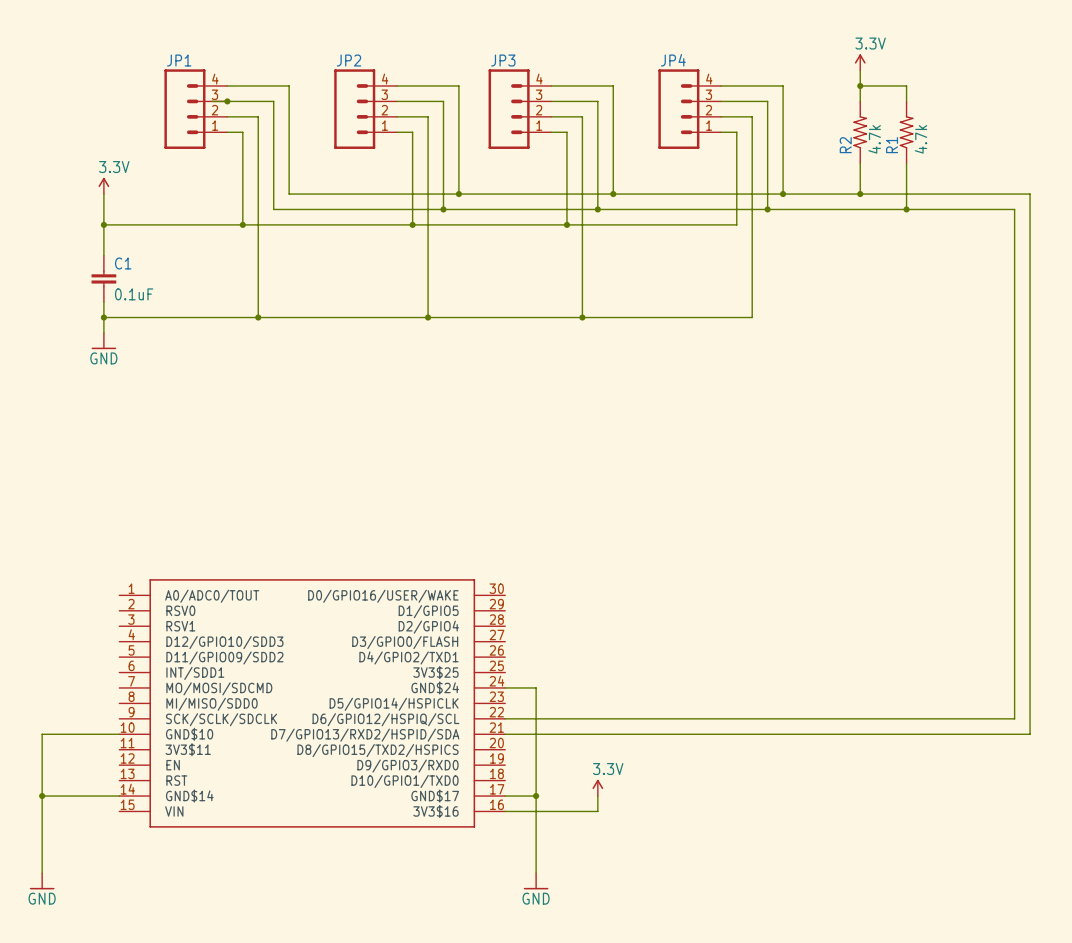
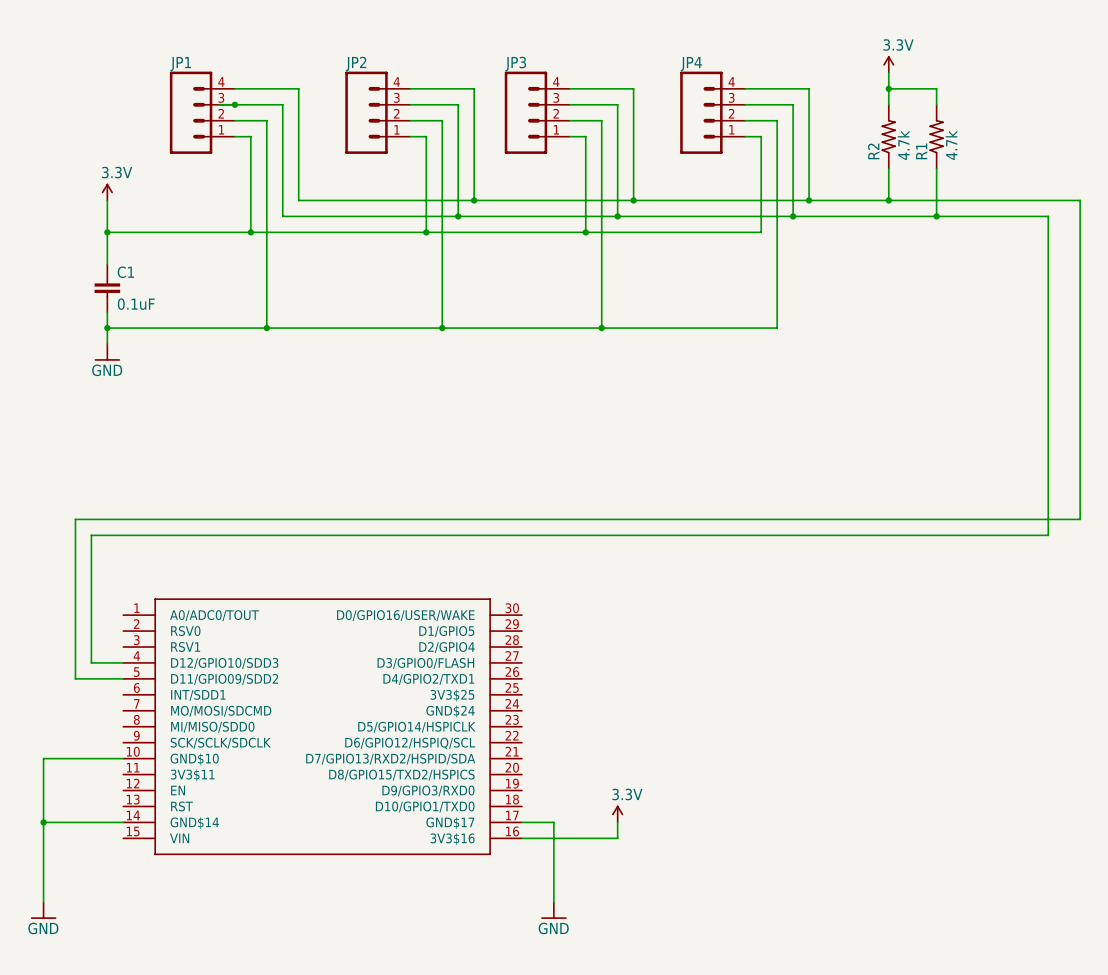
wire: (1030, 194) (1030, 734) (505, 734) -> (1064, 200) (1080, 200) (1080, 519) (75, 519) (75, 678) (123, 678)
wire: (1014, 518) (1014, 718) (505, 718) -> (1048, 535) (91, 535) (91, 662) (123, 662)
wire: (505, 687) (536, 687) (536, 796) -> none
junction: (536, 796) -> none

